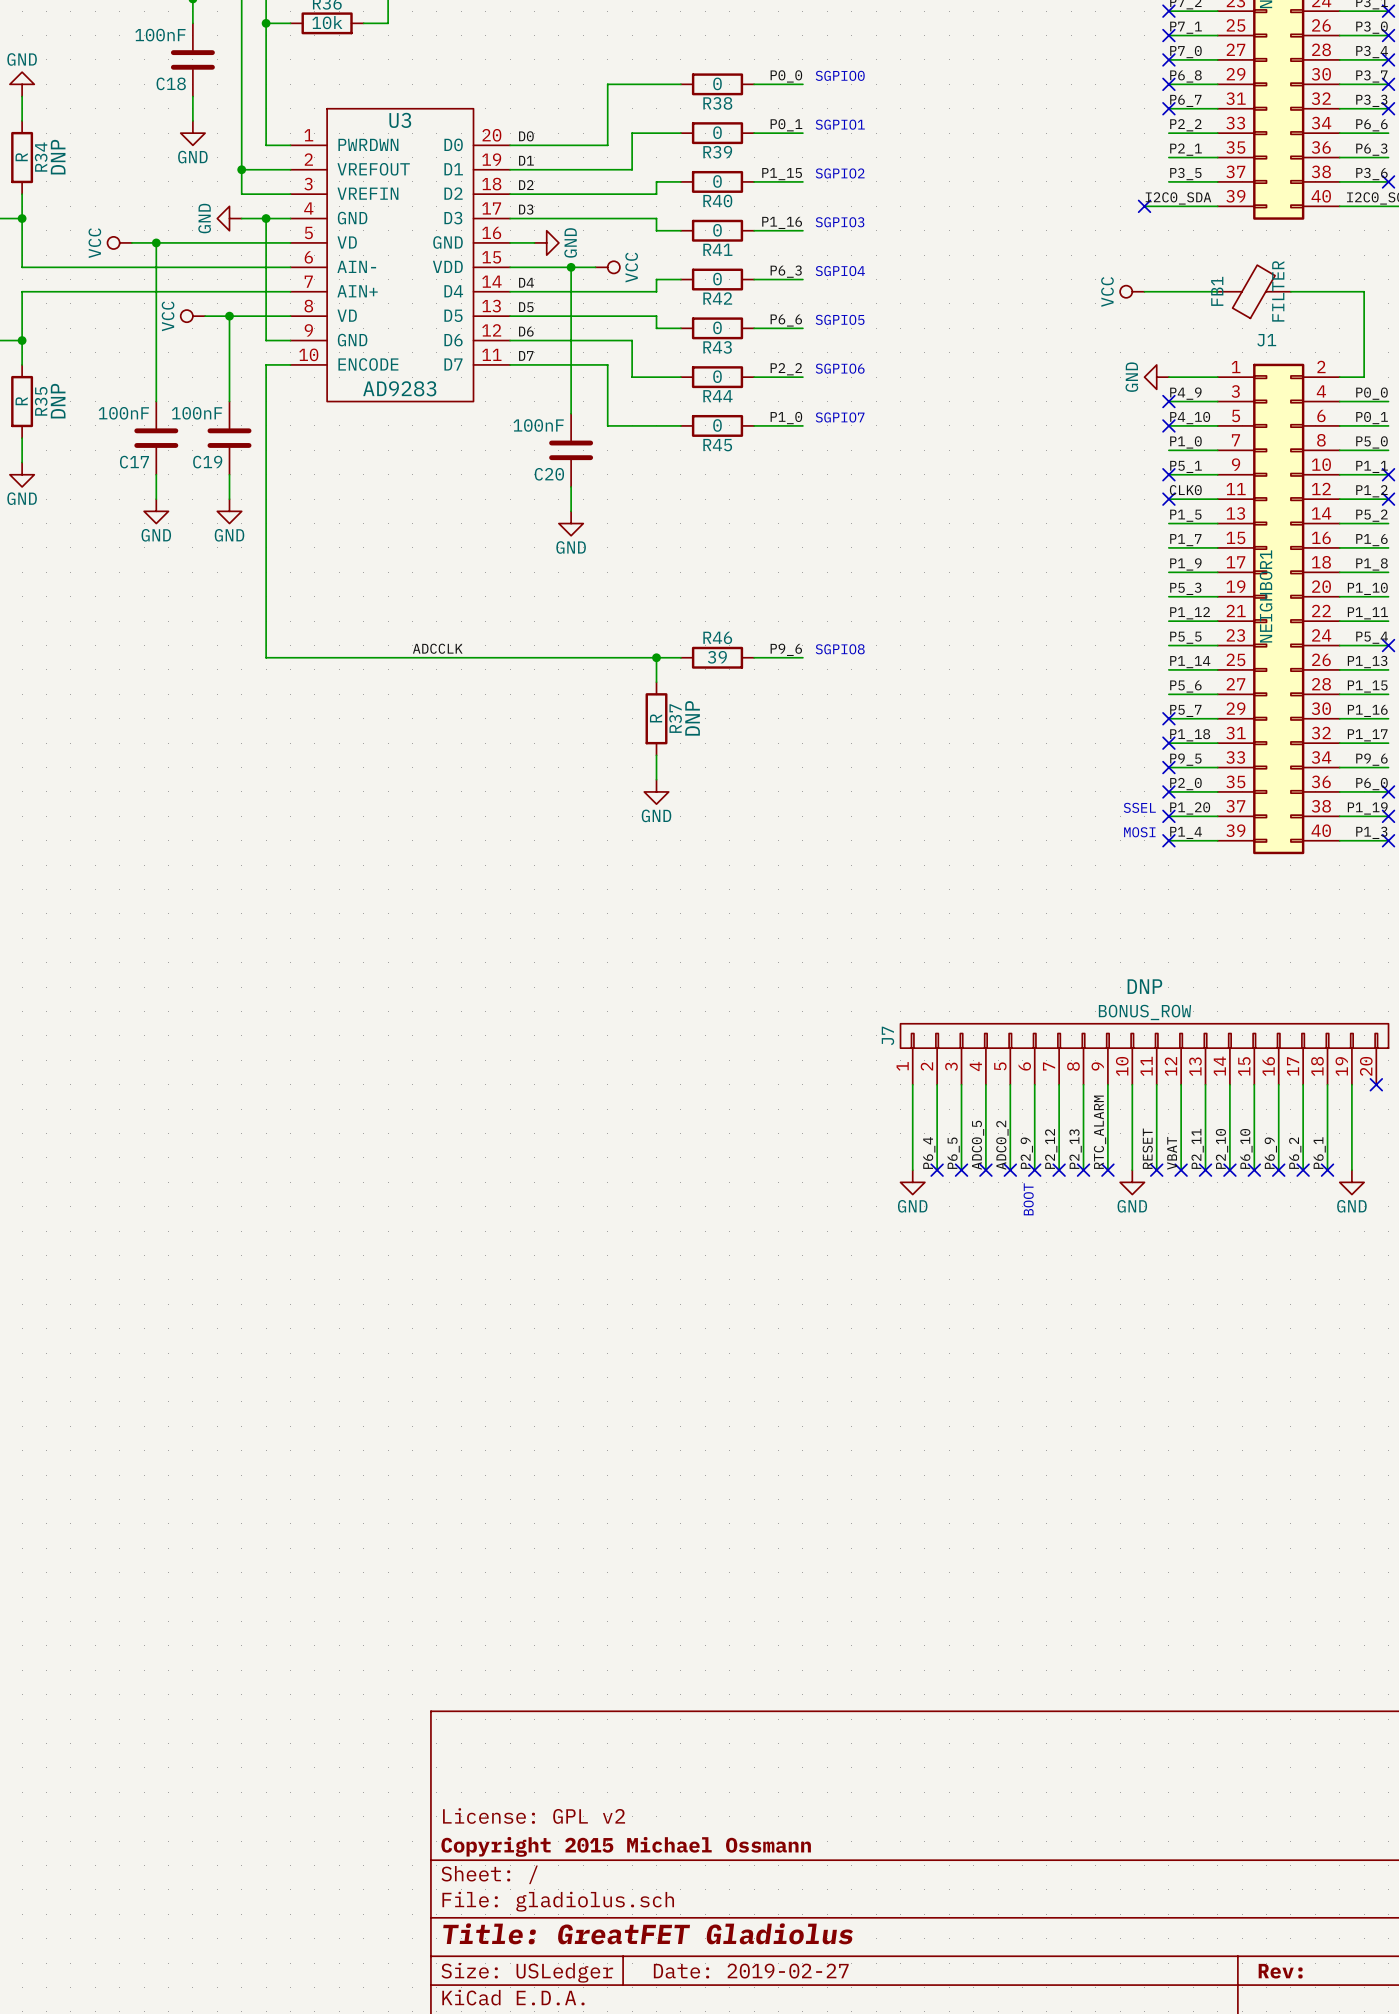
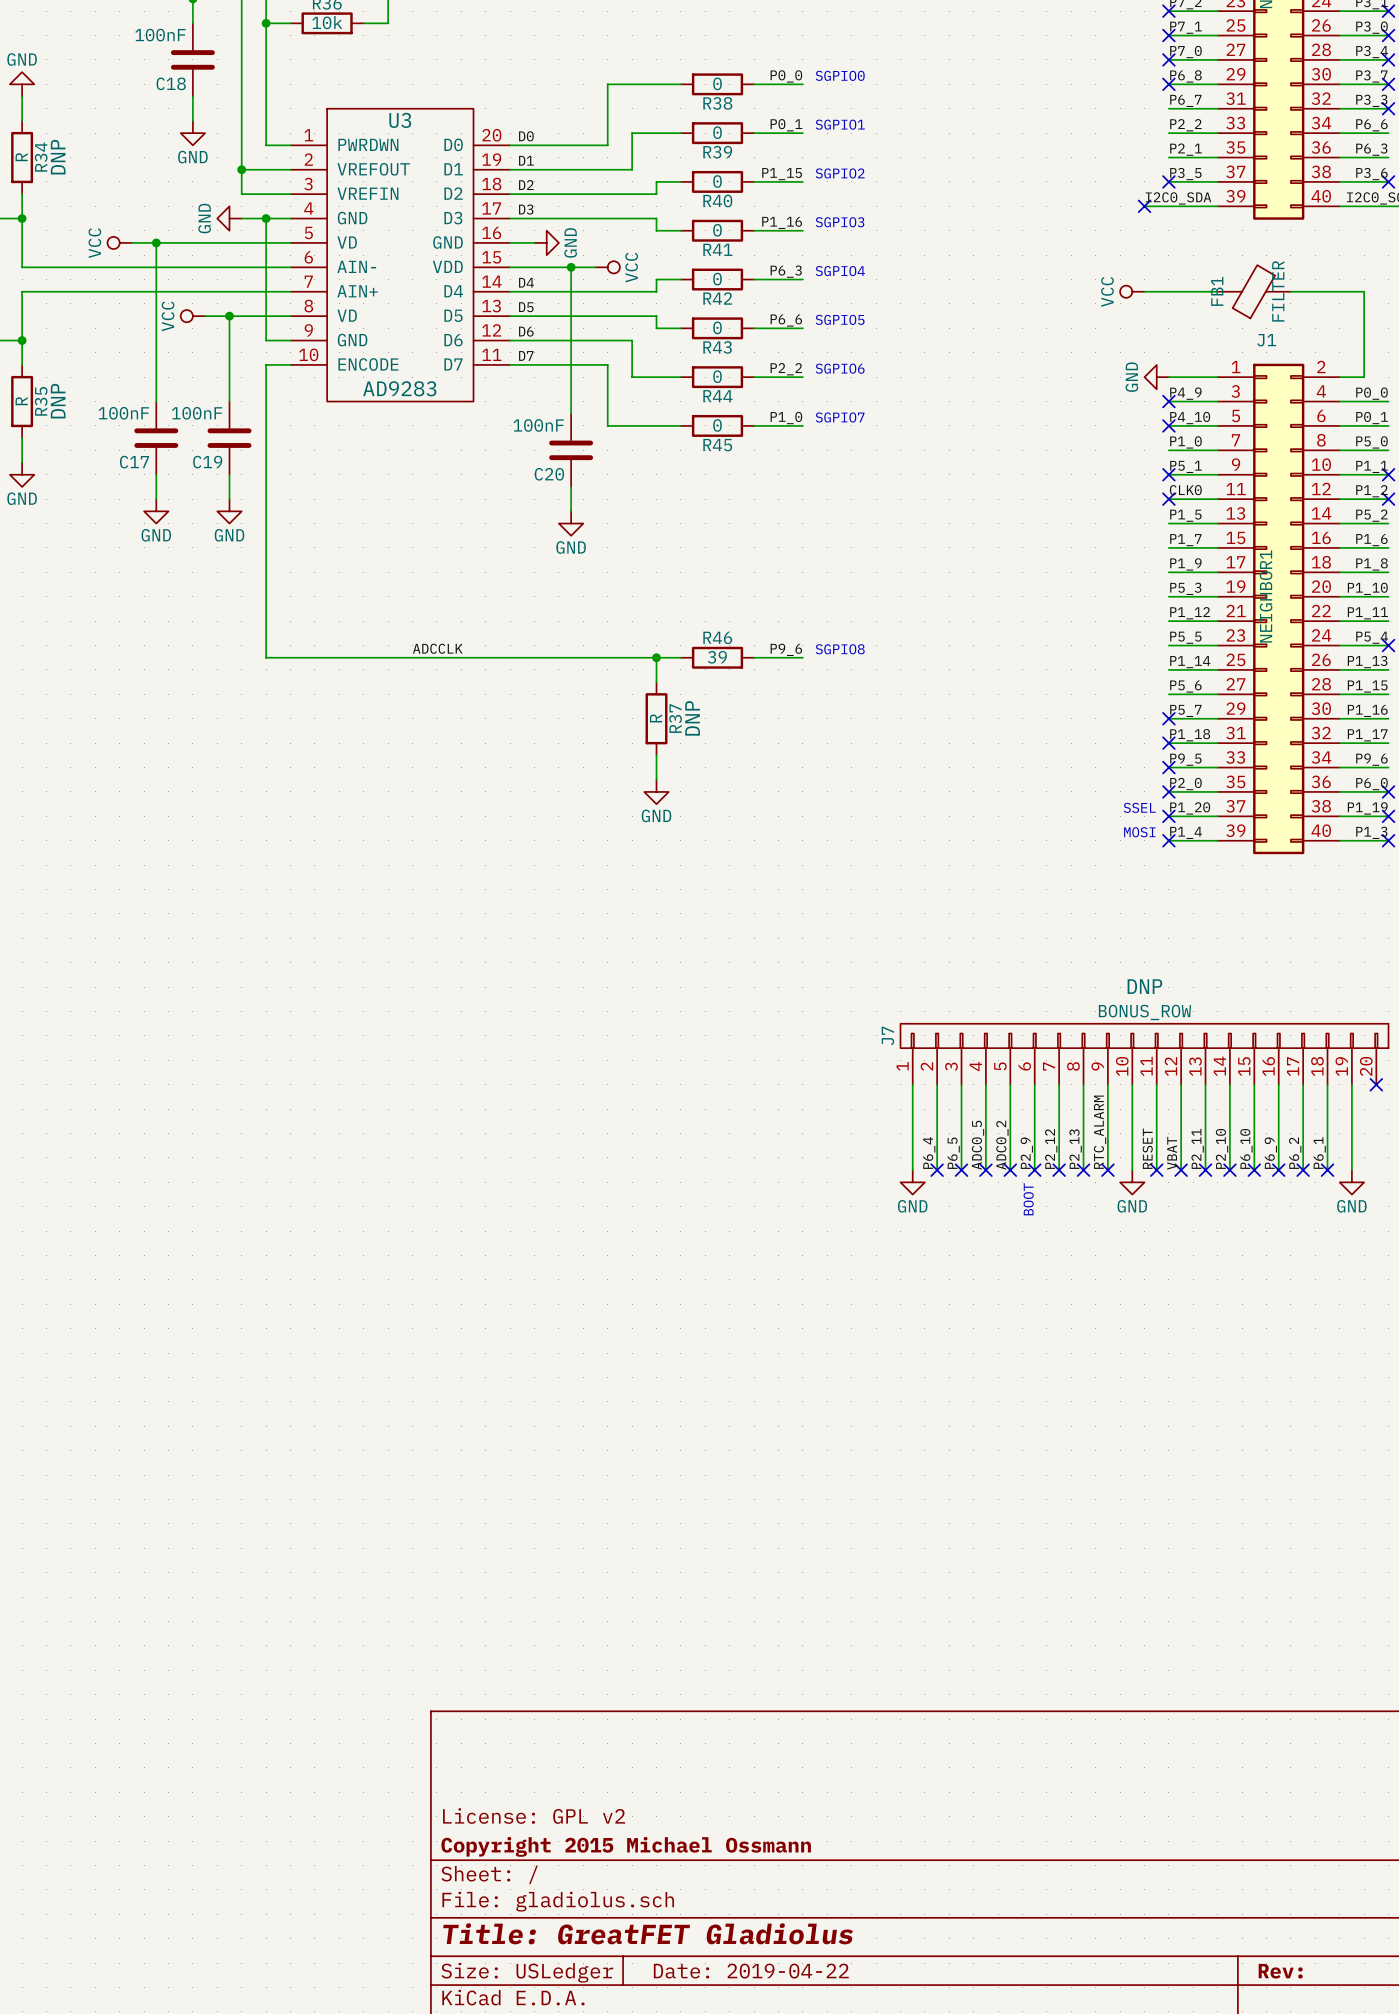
no-connect mark: (1168, 108) -> none
no-connect mark: none -> (1168, 181)
title block: Date: 2019-02-27 (751, 1971) -> Date: 2019-04-22 (751, 1971)

